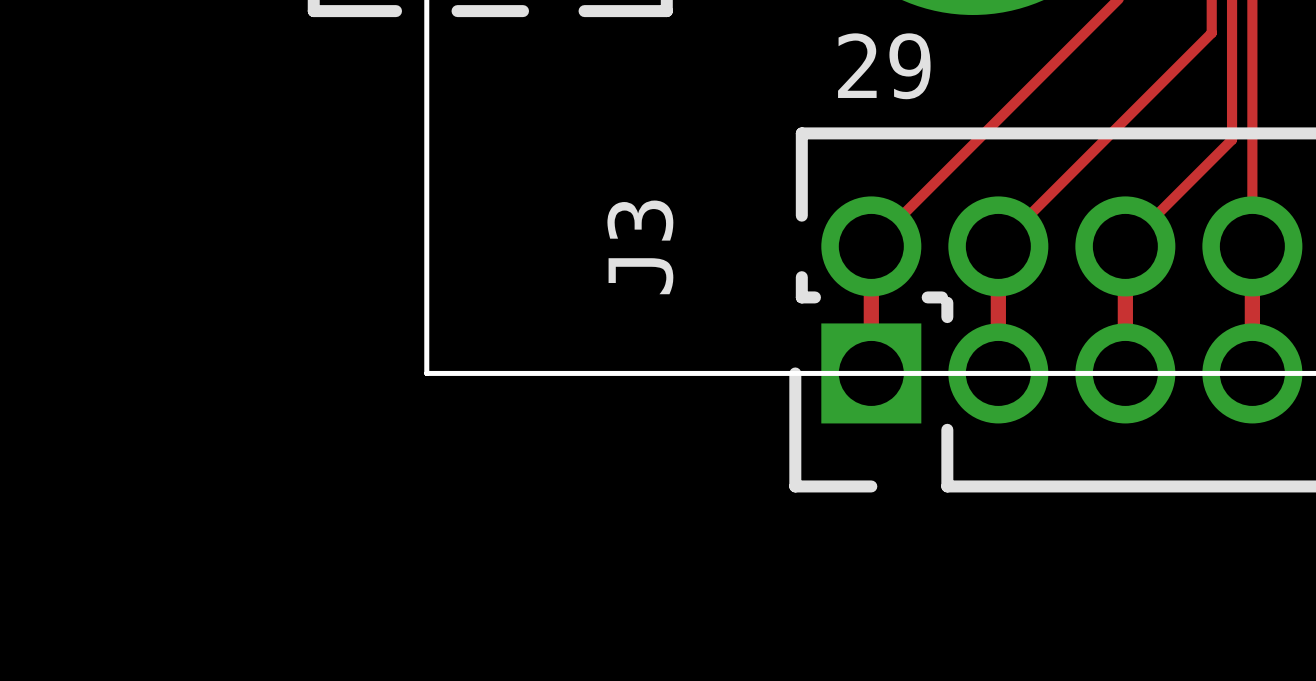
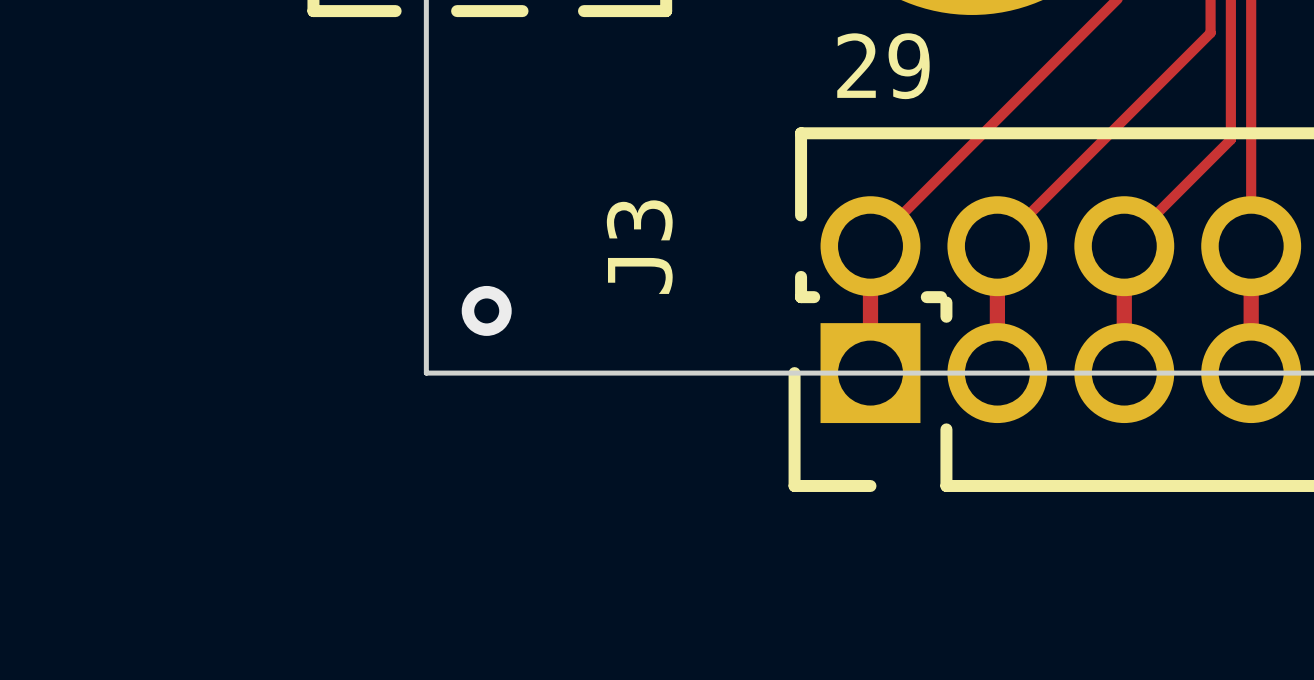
via: none -> (486, 310)

